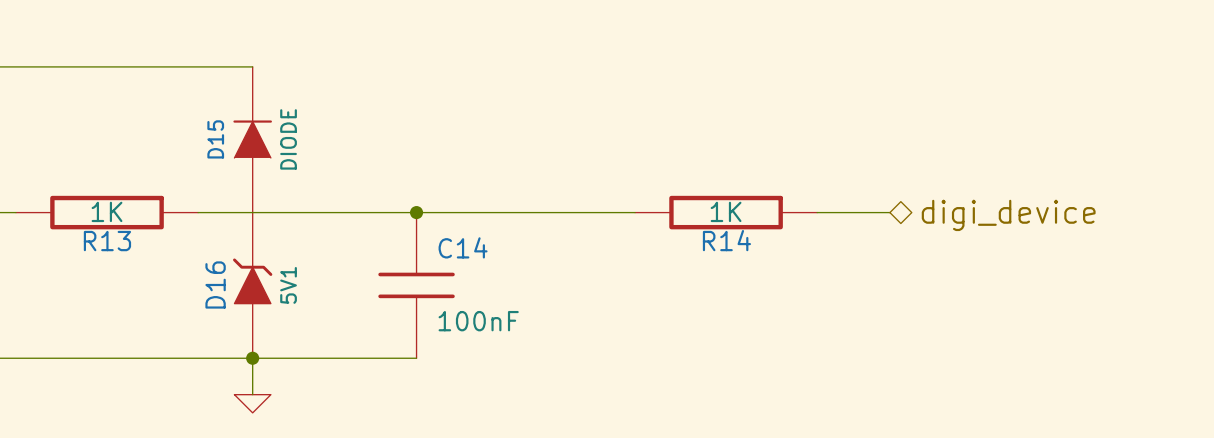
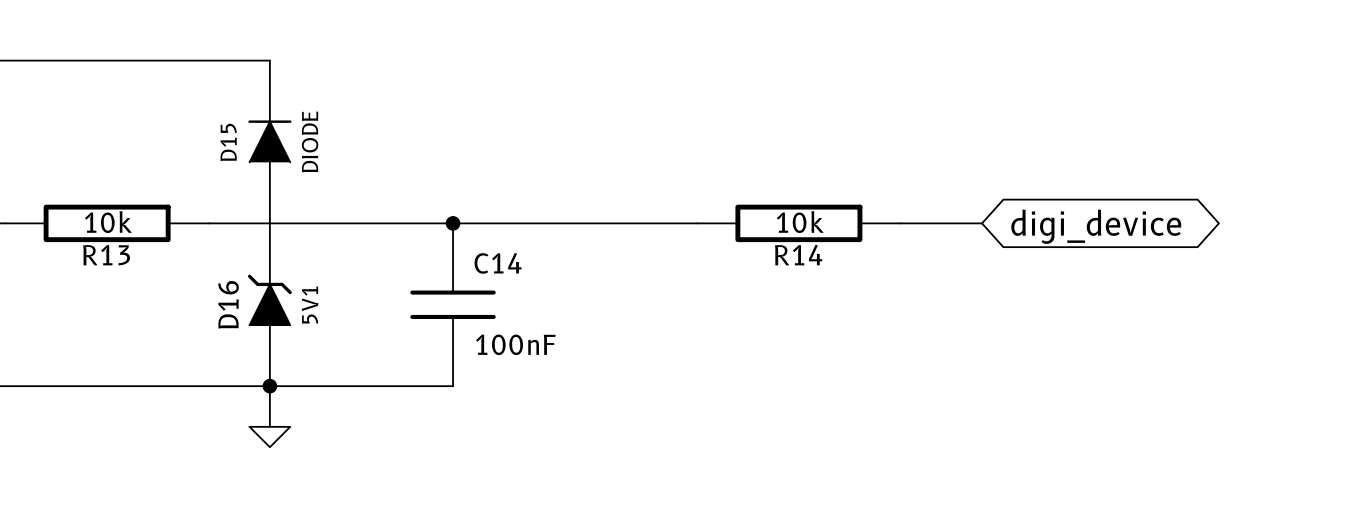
R13 value: 1K (107, 211) -> 10k (108, 222)
R14 value: 1K (726, 211) -> 10k (800, 222)
hierarchical label: digi_device (1008, 215) -> none
global label: none -> digi_device (1096, 226)

